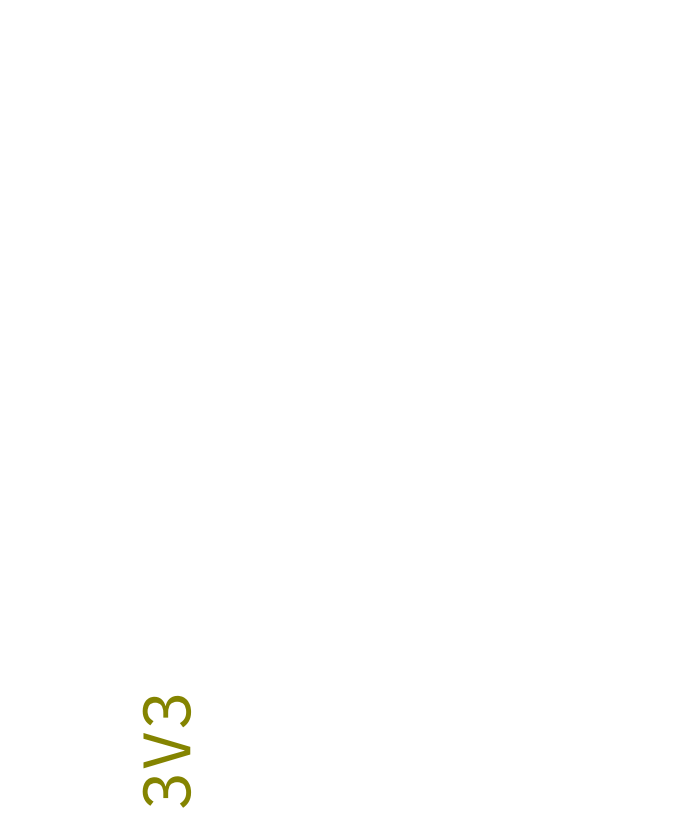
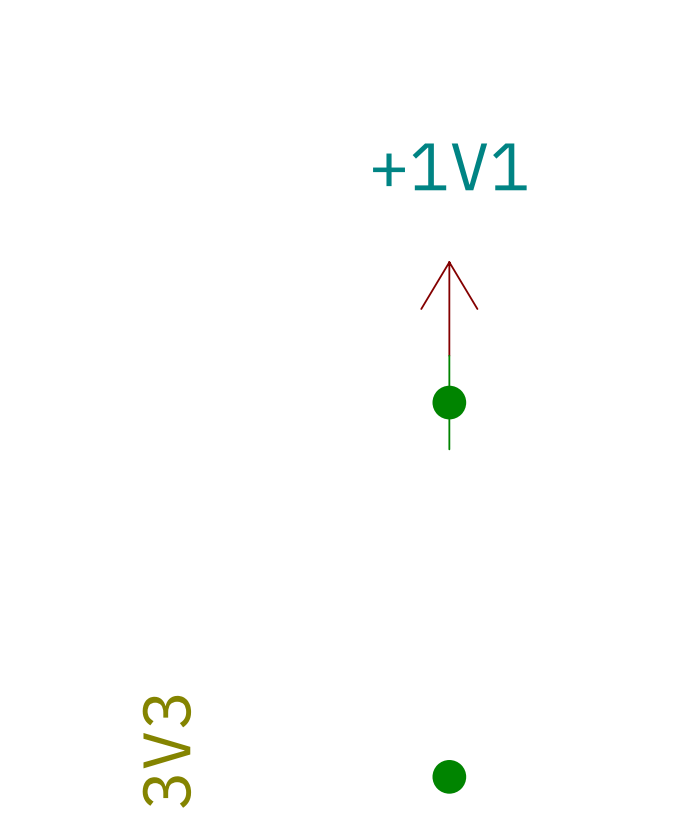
power symbol: none -> +1V1 (449, 308)
wire: none -> (449, 355) (449, 449)
junction: none -> (449, 402)
junction: none -> (449, 776)

